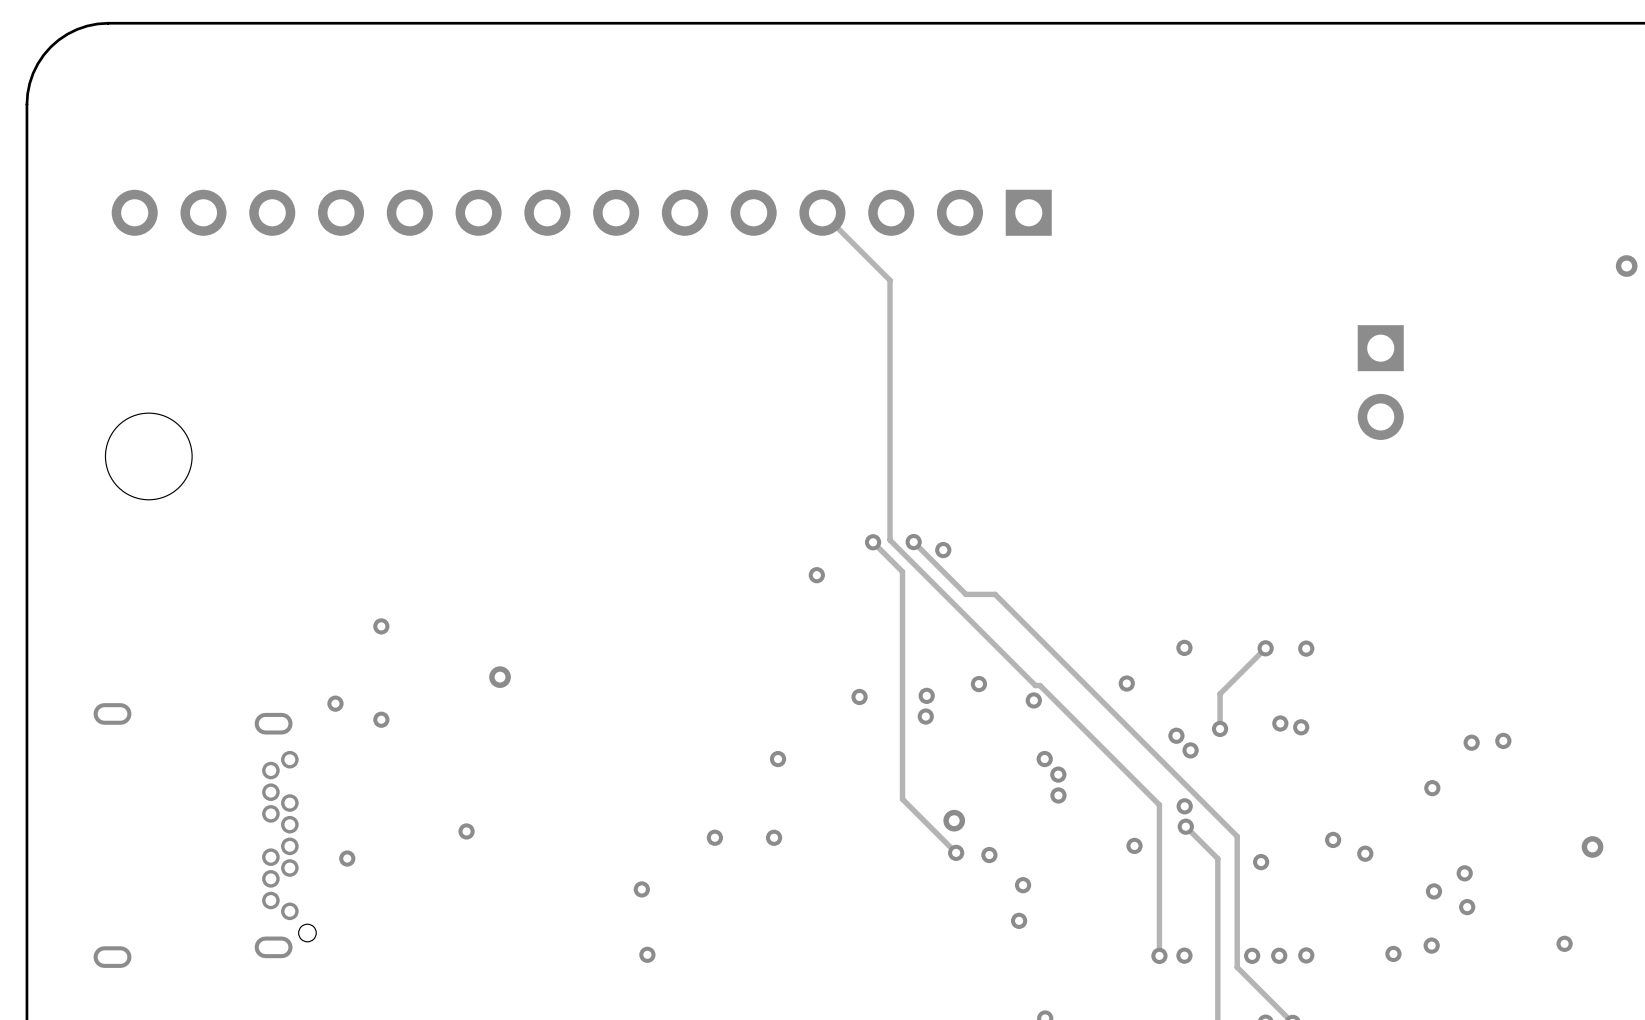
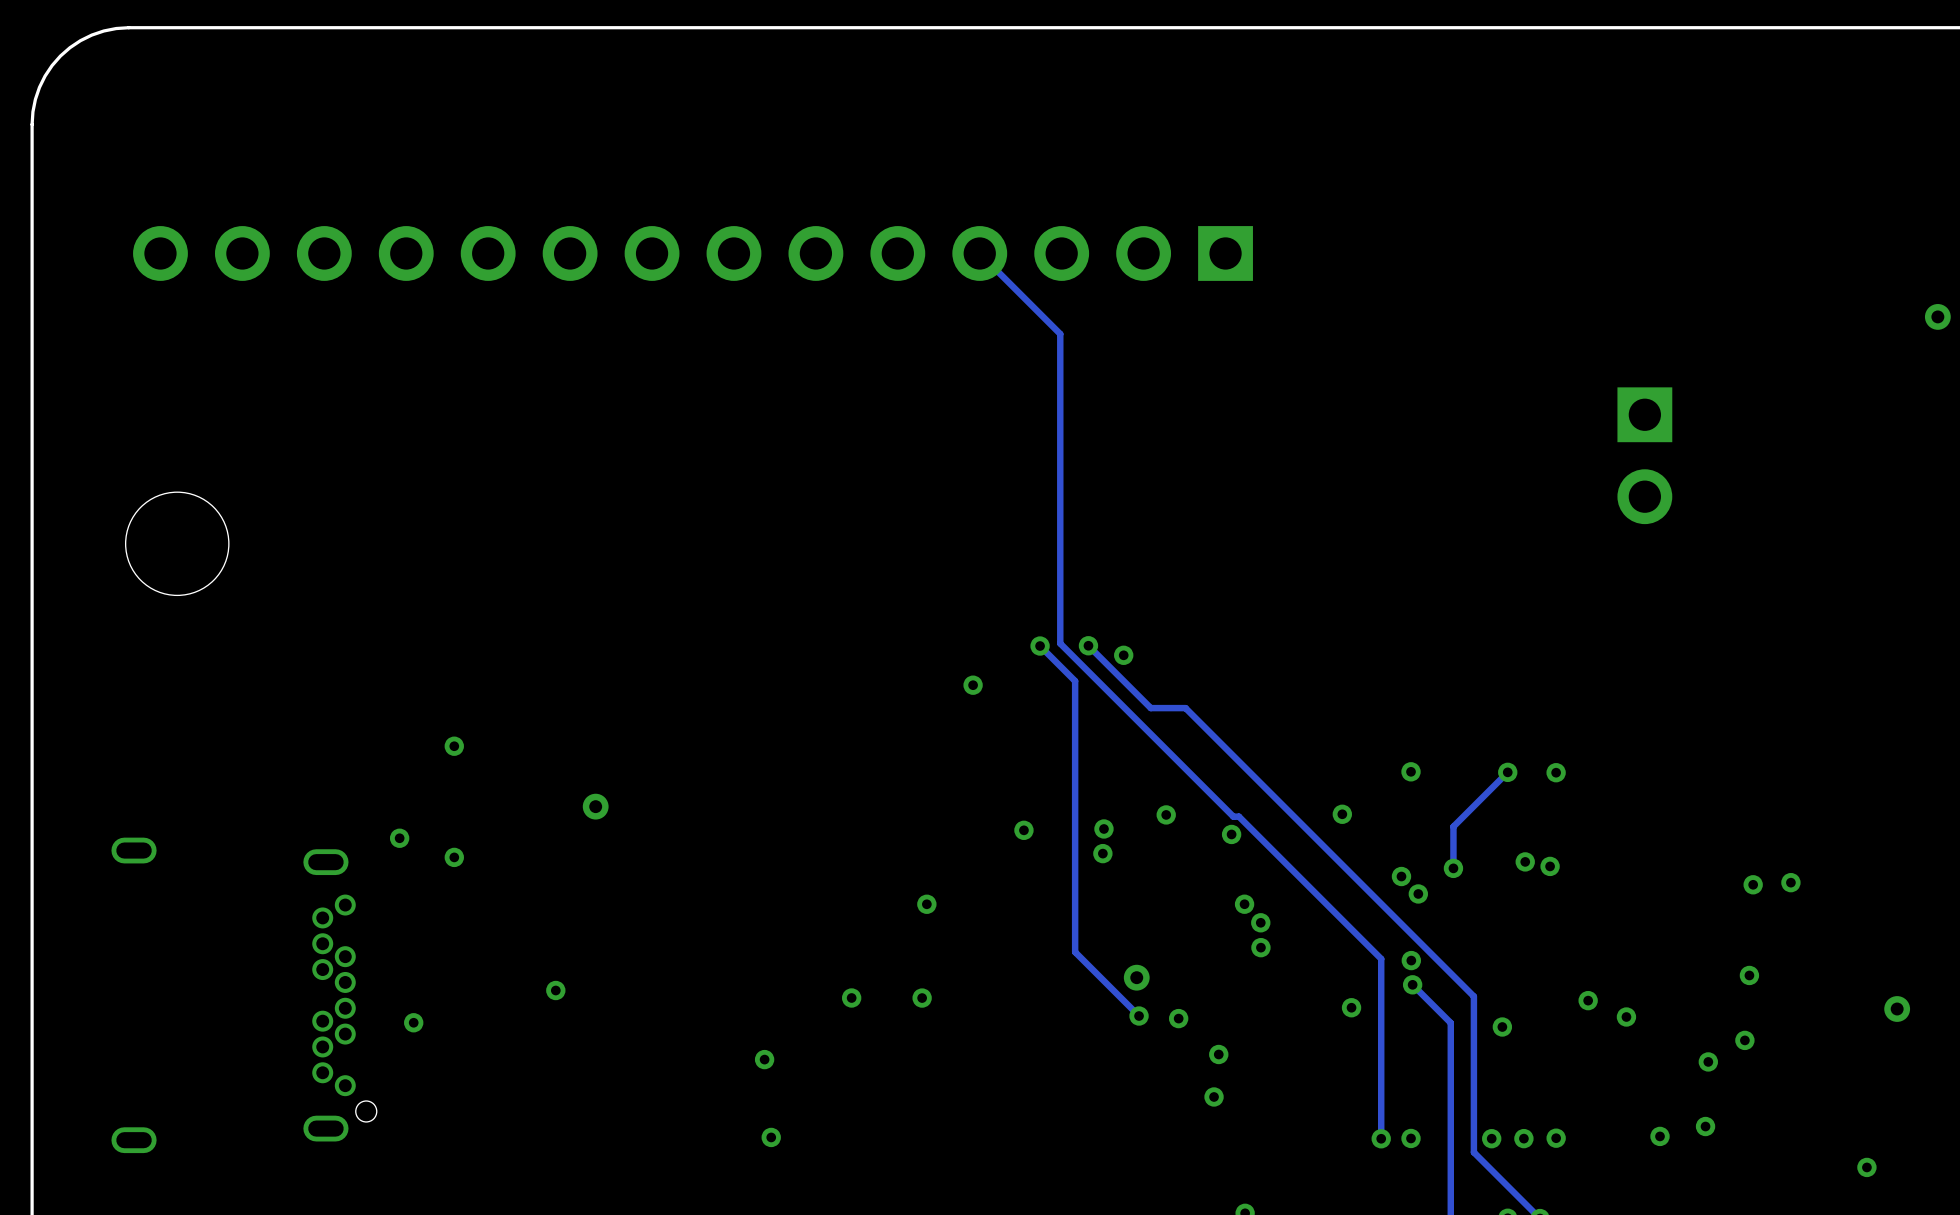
via: (1432, 788) -> none
via: none -> (1749, 975)
via: (1467, 907) -> none
via position: (1564, 943) -> (1866, 1167)

